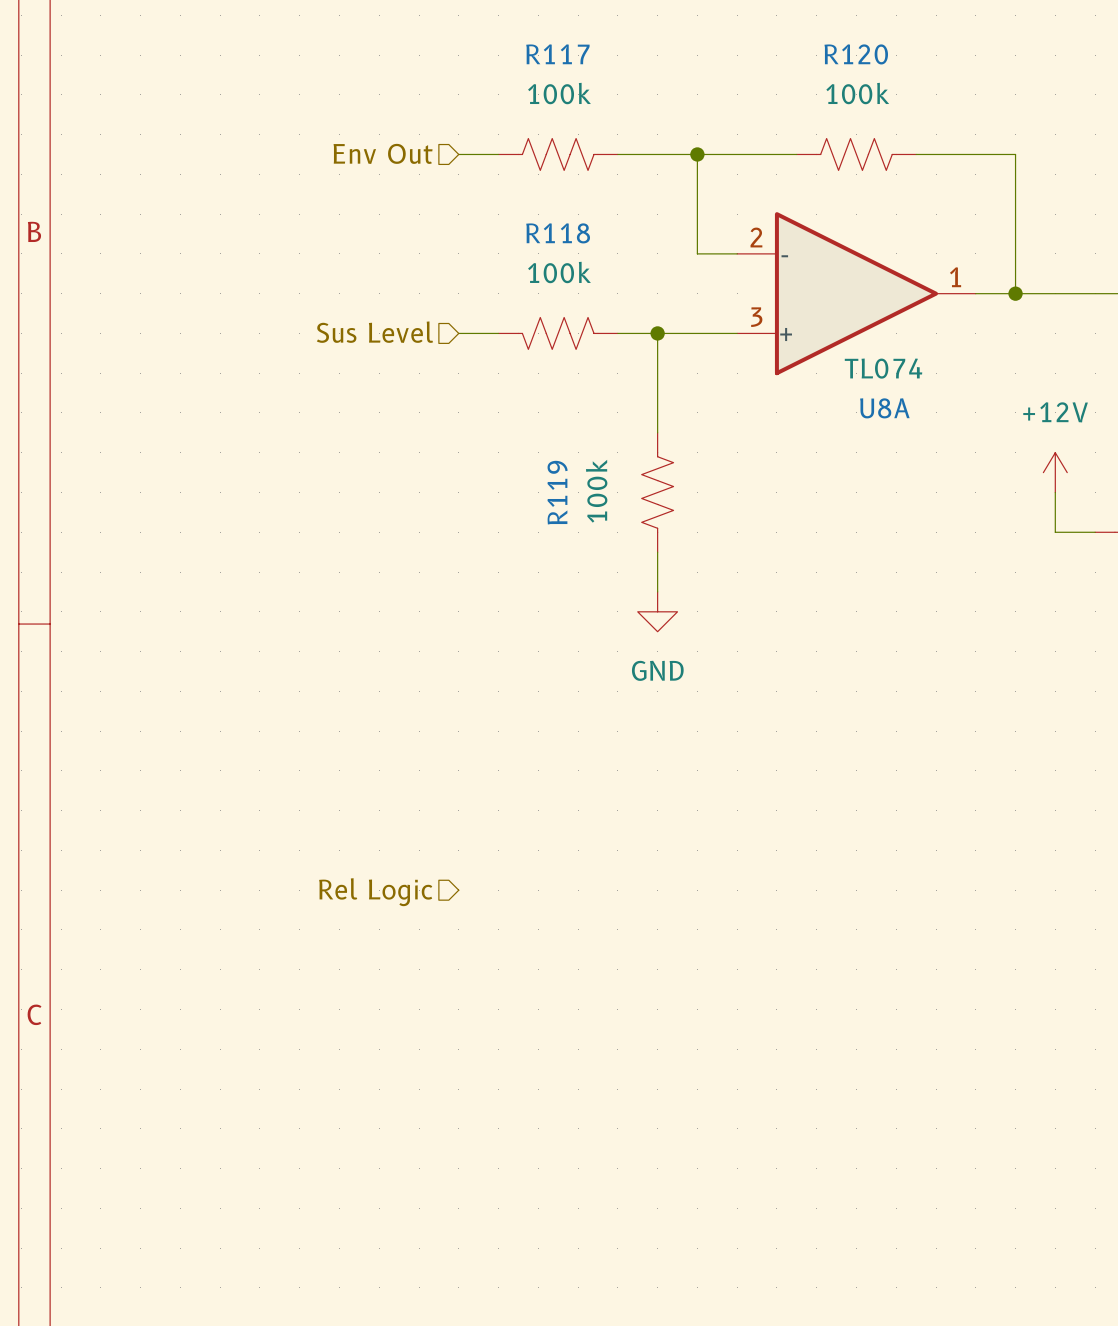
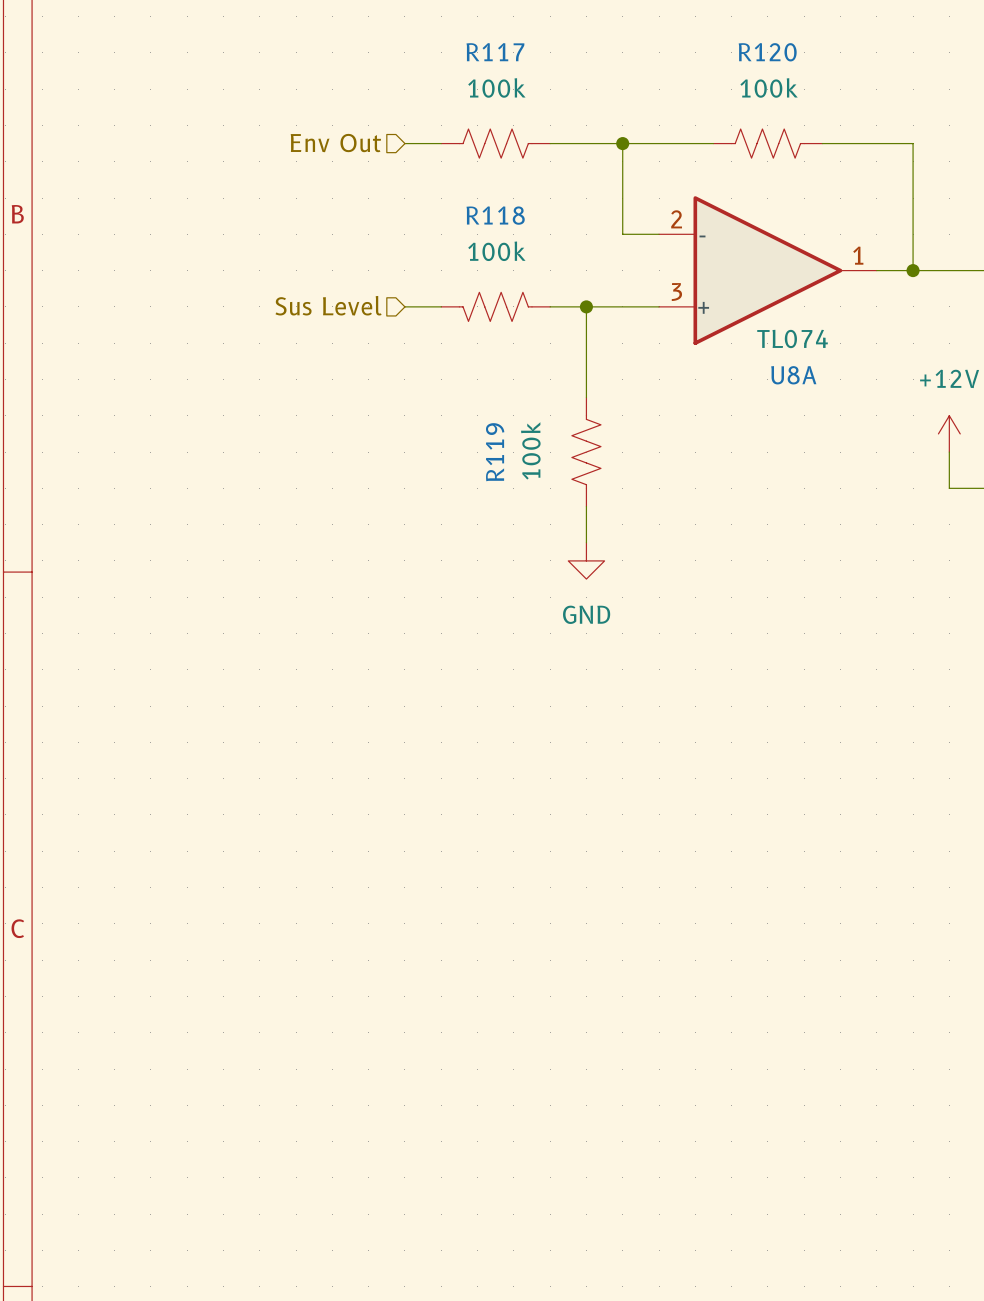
hierarchical label: Rel Logic (375, 892) -> none

